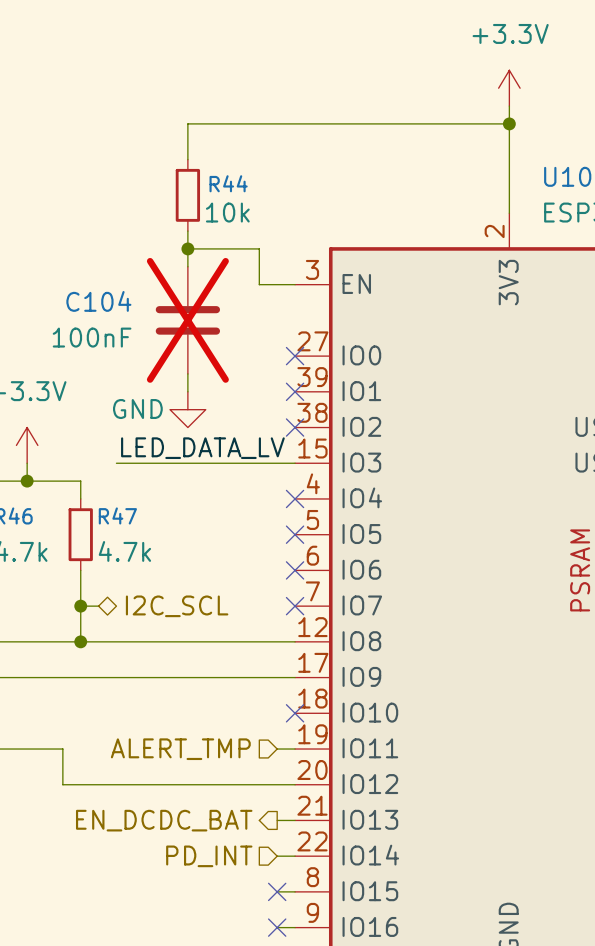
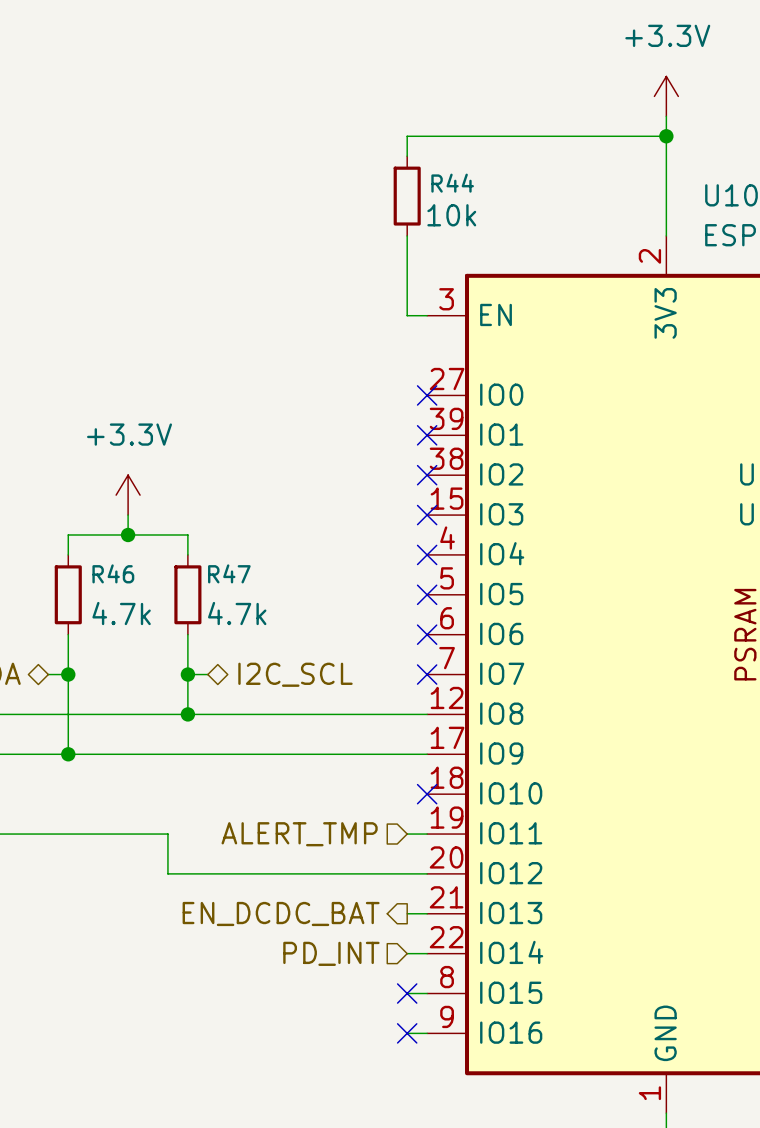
wire: (277, 123) (187, 123) (187, 159) -> (407, 136) (407, 156)
R44 position: (187, 195) -> (407, 196)
wire: (187, 231) (187, 266) -> none
wire: (187, 248) (259, 248) (259, 284) (277, 284) -> (407, 235) (407, 315)
junction: (187, 248) -> none
C104: 100nF (187, 320) -> none
wire: (187, 373) (187, 391) -> none
power symbol: GND (187, 409) -> none
label: LED_DATA_LV (202, 448) -> none
wire: (116, 463) (295, 463) -> none
no-connect mark: none -> (427, 515)

